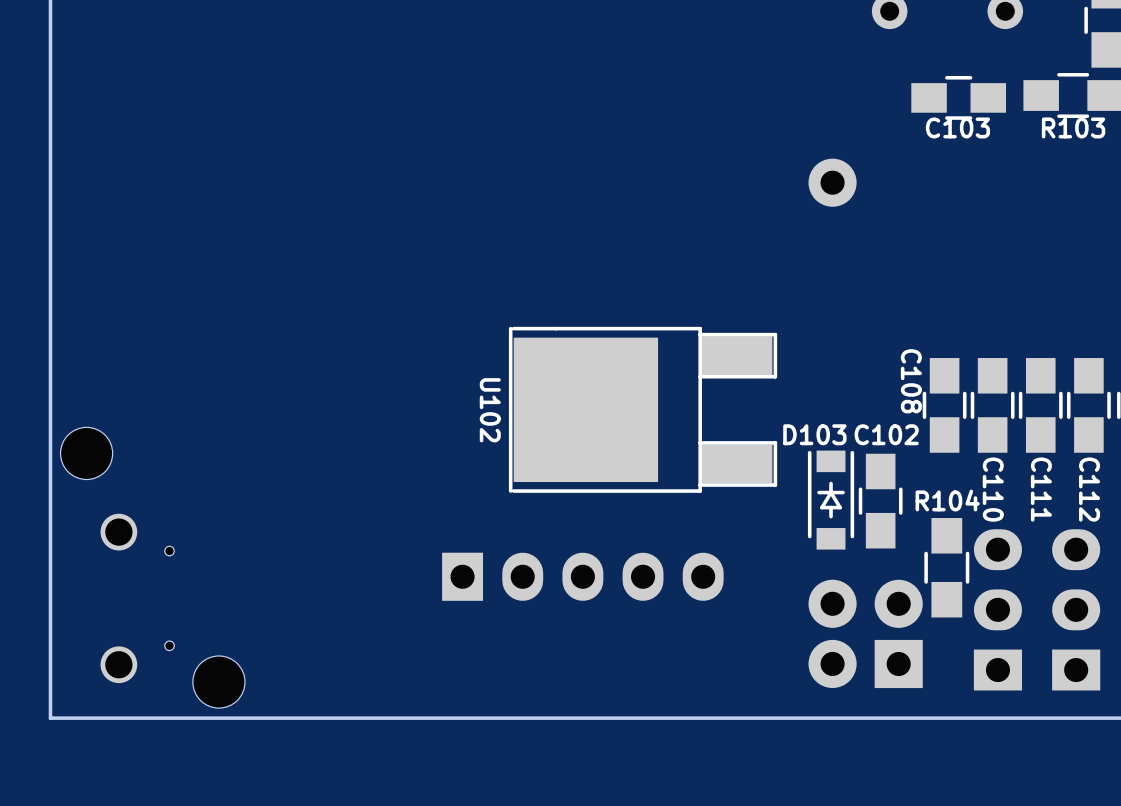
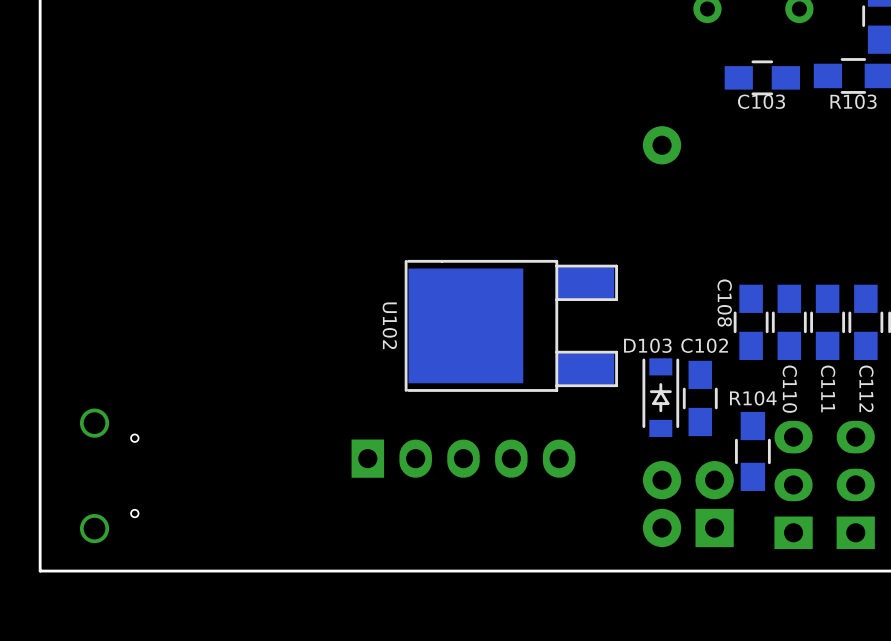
part: (86, 453) -> none
part: (218, 682) -> none

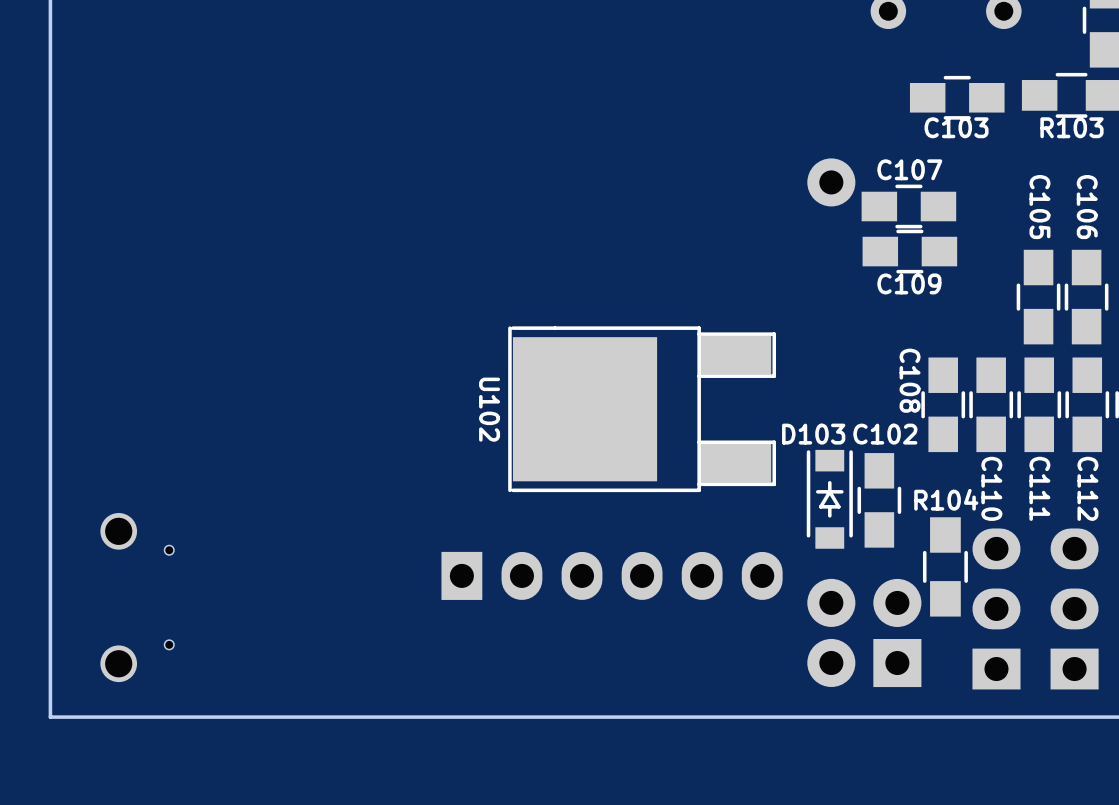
C107: none -> (908, 206)
C109: none -> (909, 251)
C105: none -> (1038, 297)
C106: none -> (1086, 297)
part: none -> (612, 575)

